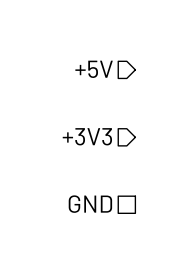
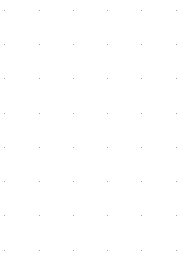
hierarchical label: +5V (94, 69) -> none
hierarchical label: +3V3 (87, 136) -> none
hierarchical label: GND (90, 204) -> none

